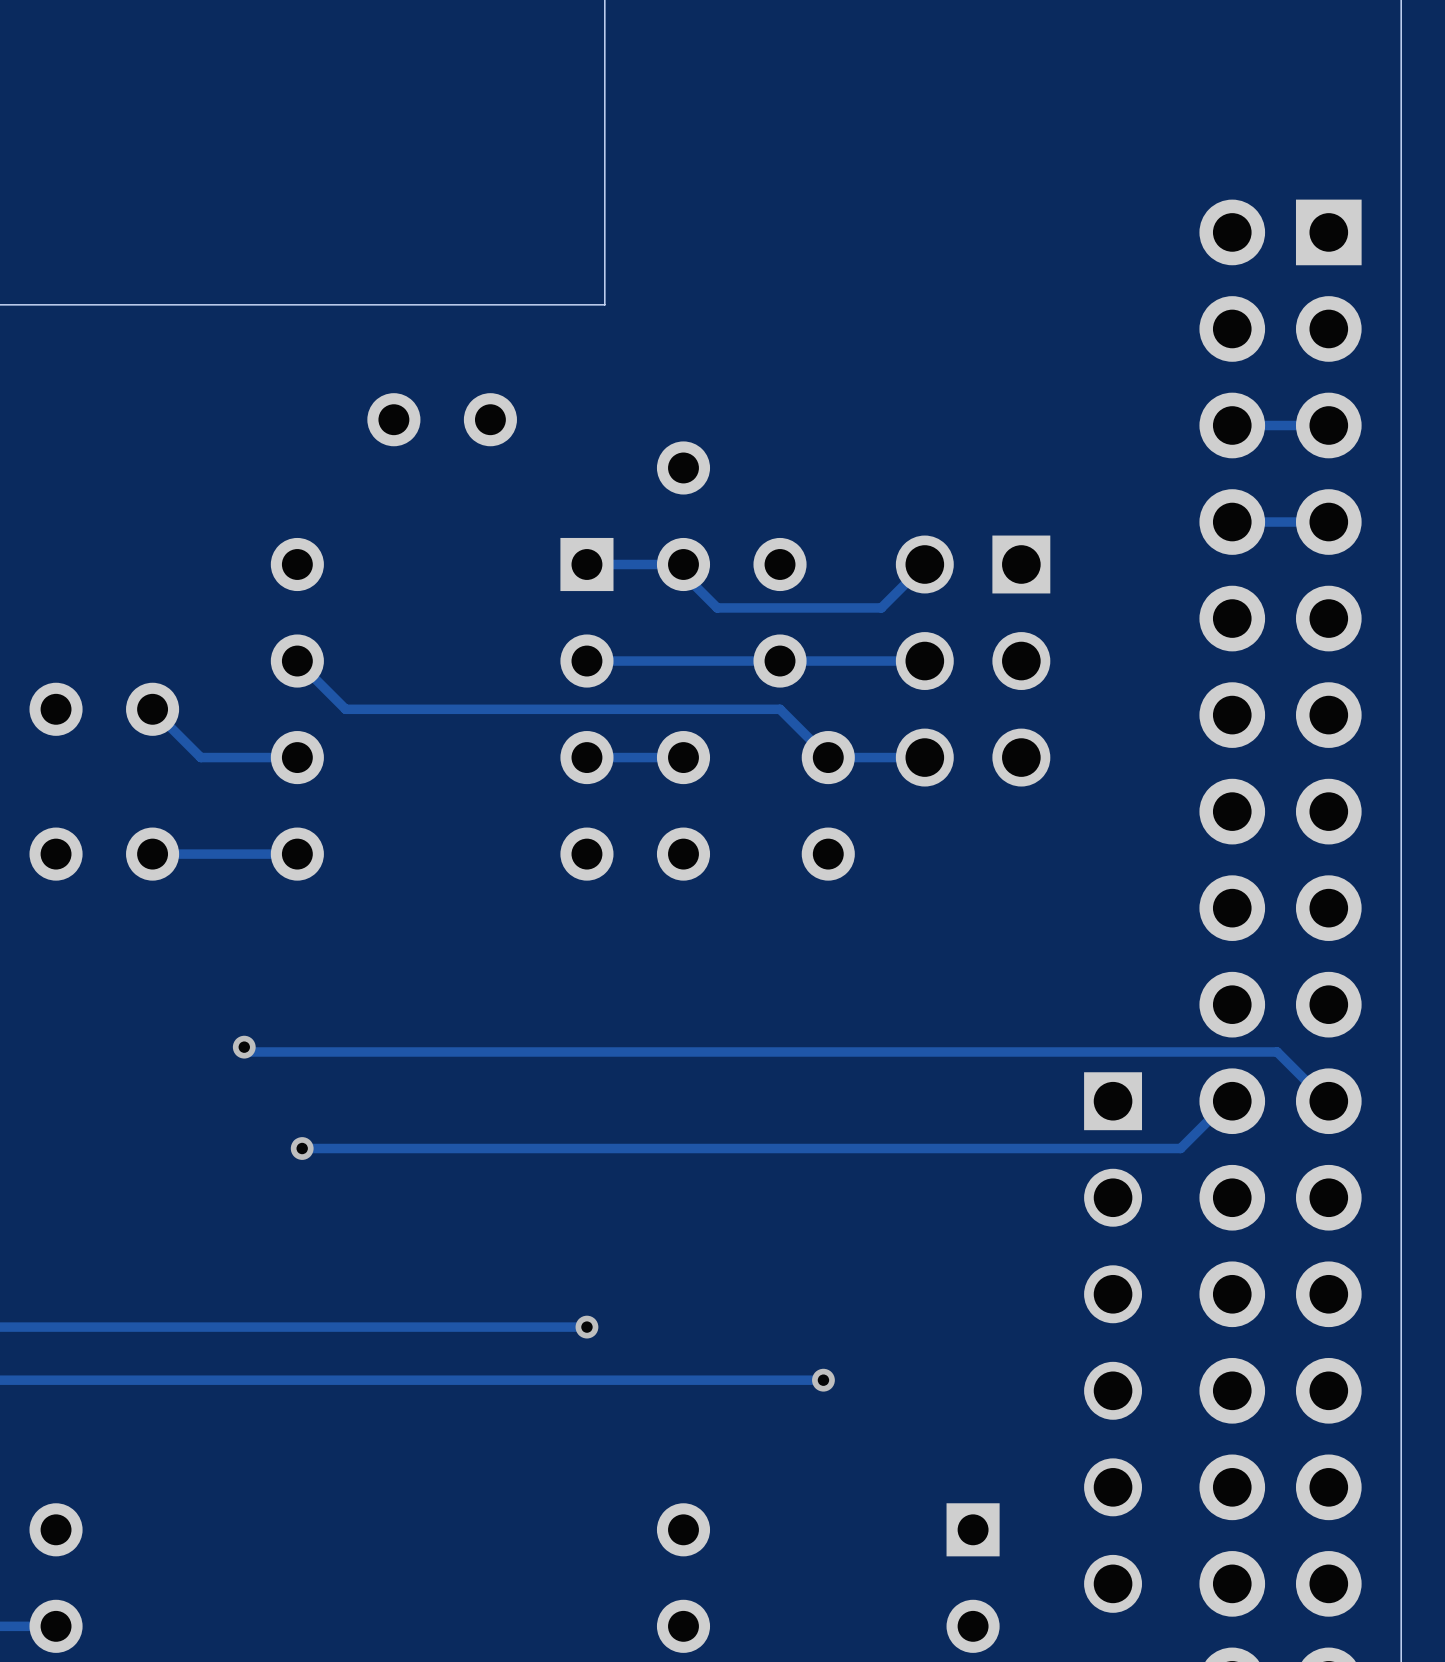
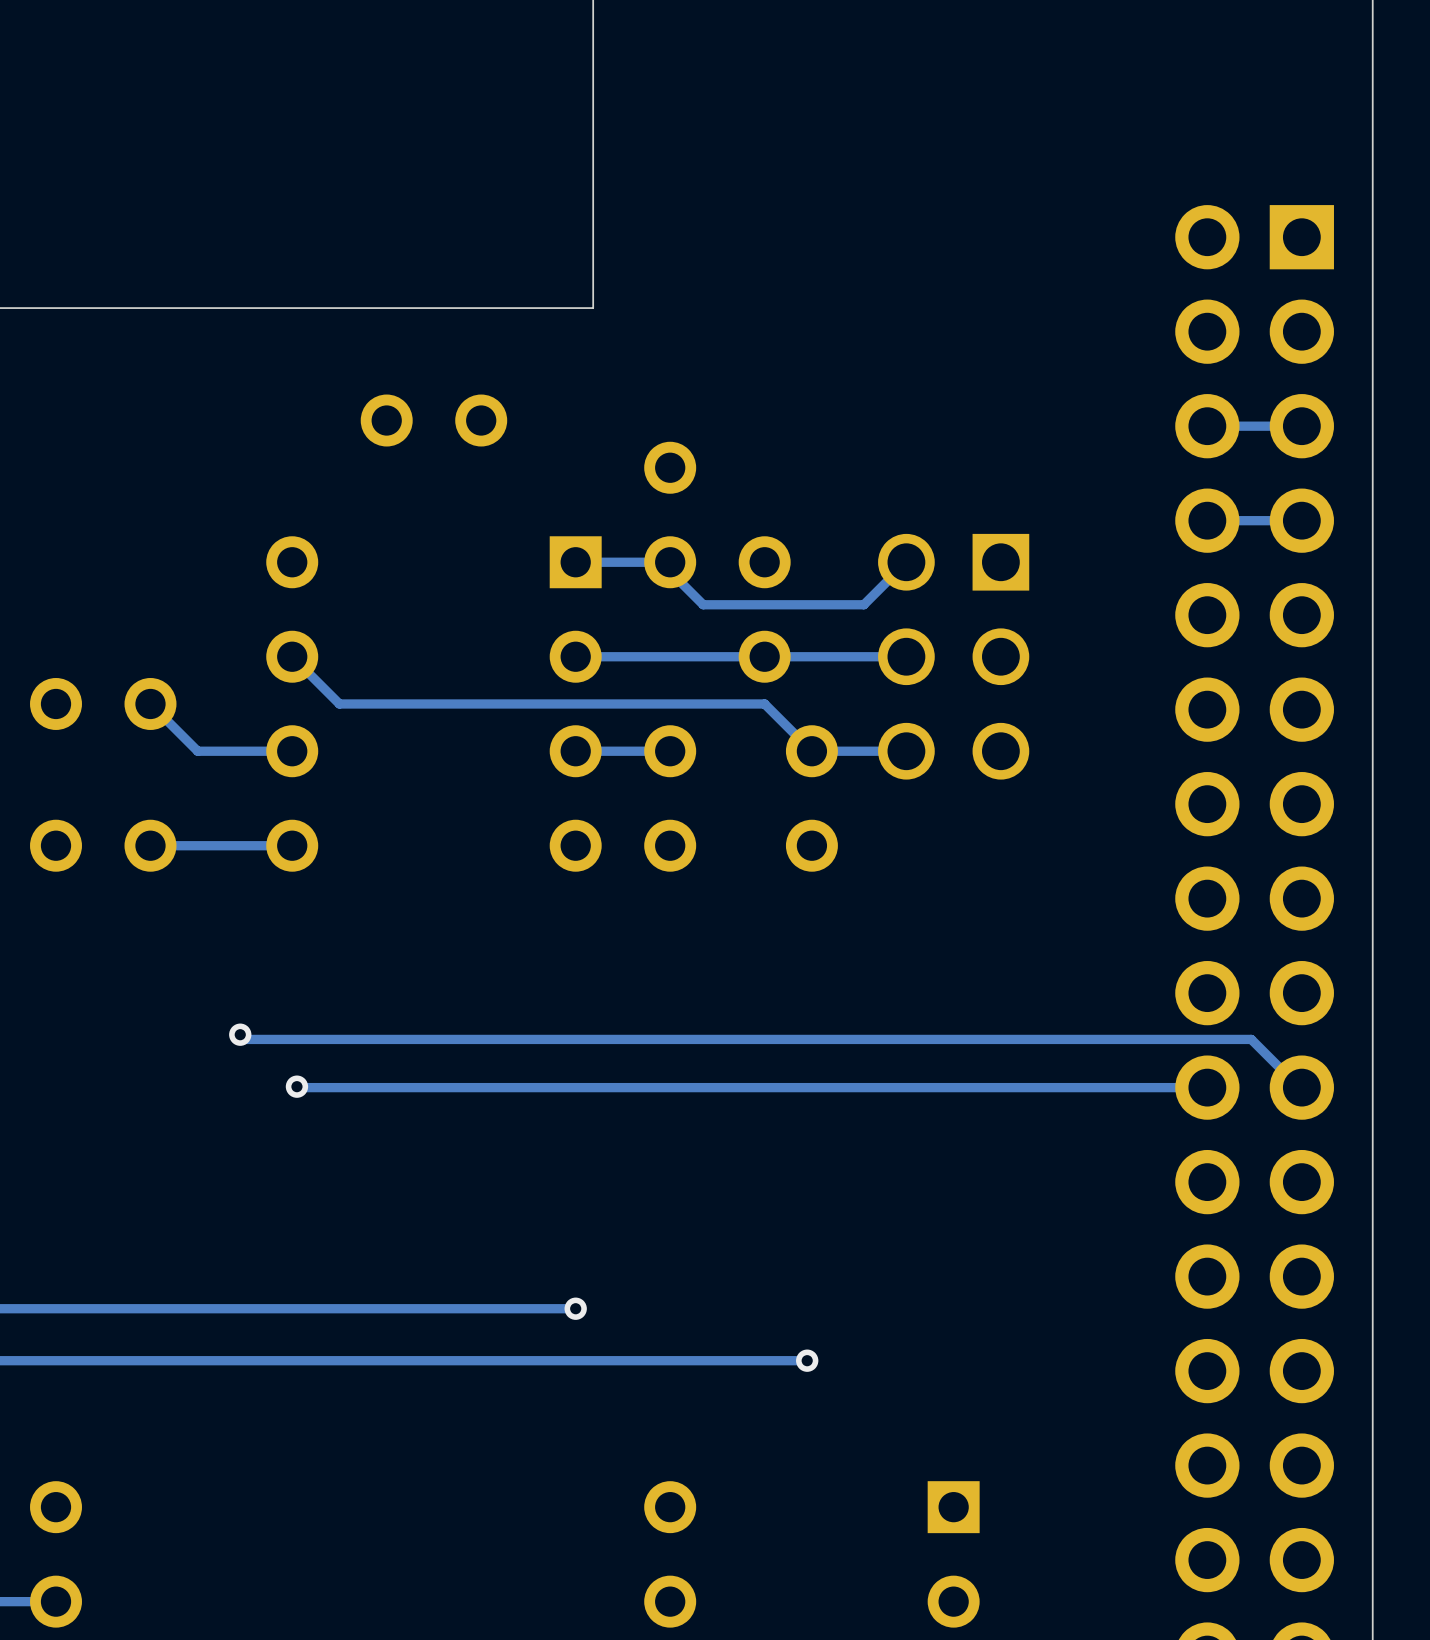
track: (1227, 1101) (1180, 1148) (302, 1148) -> (1203, 1087) (296, 1086)
via position: (302, 1148) -> (296, 1086)
part: (1113, 1342) -> none

